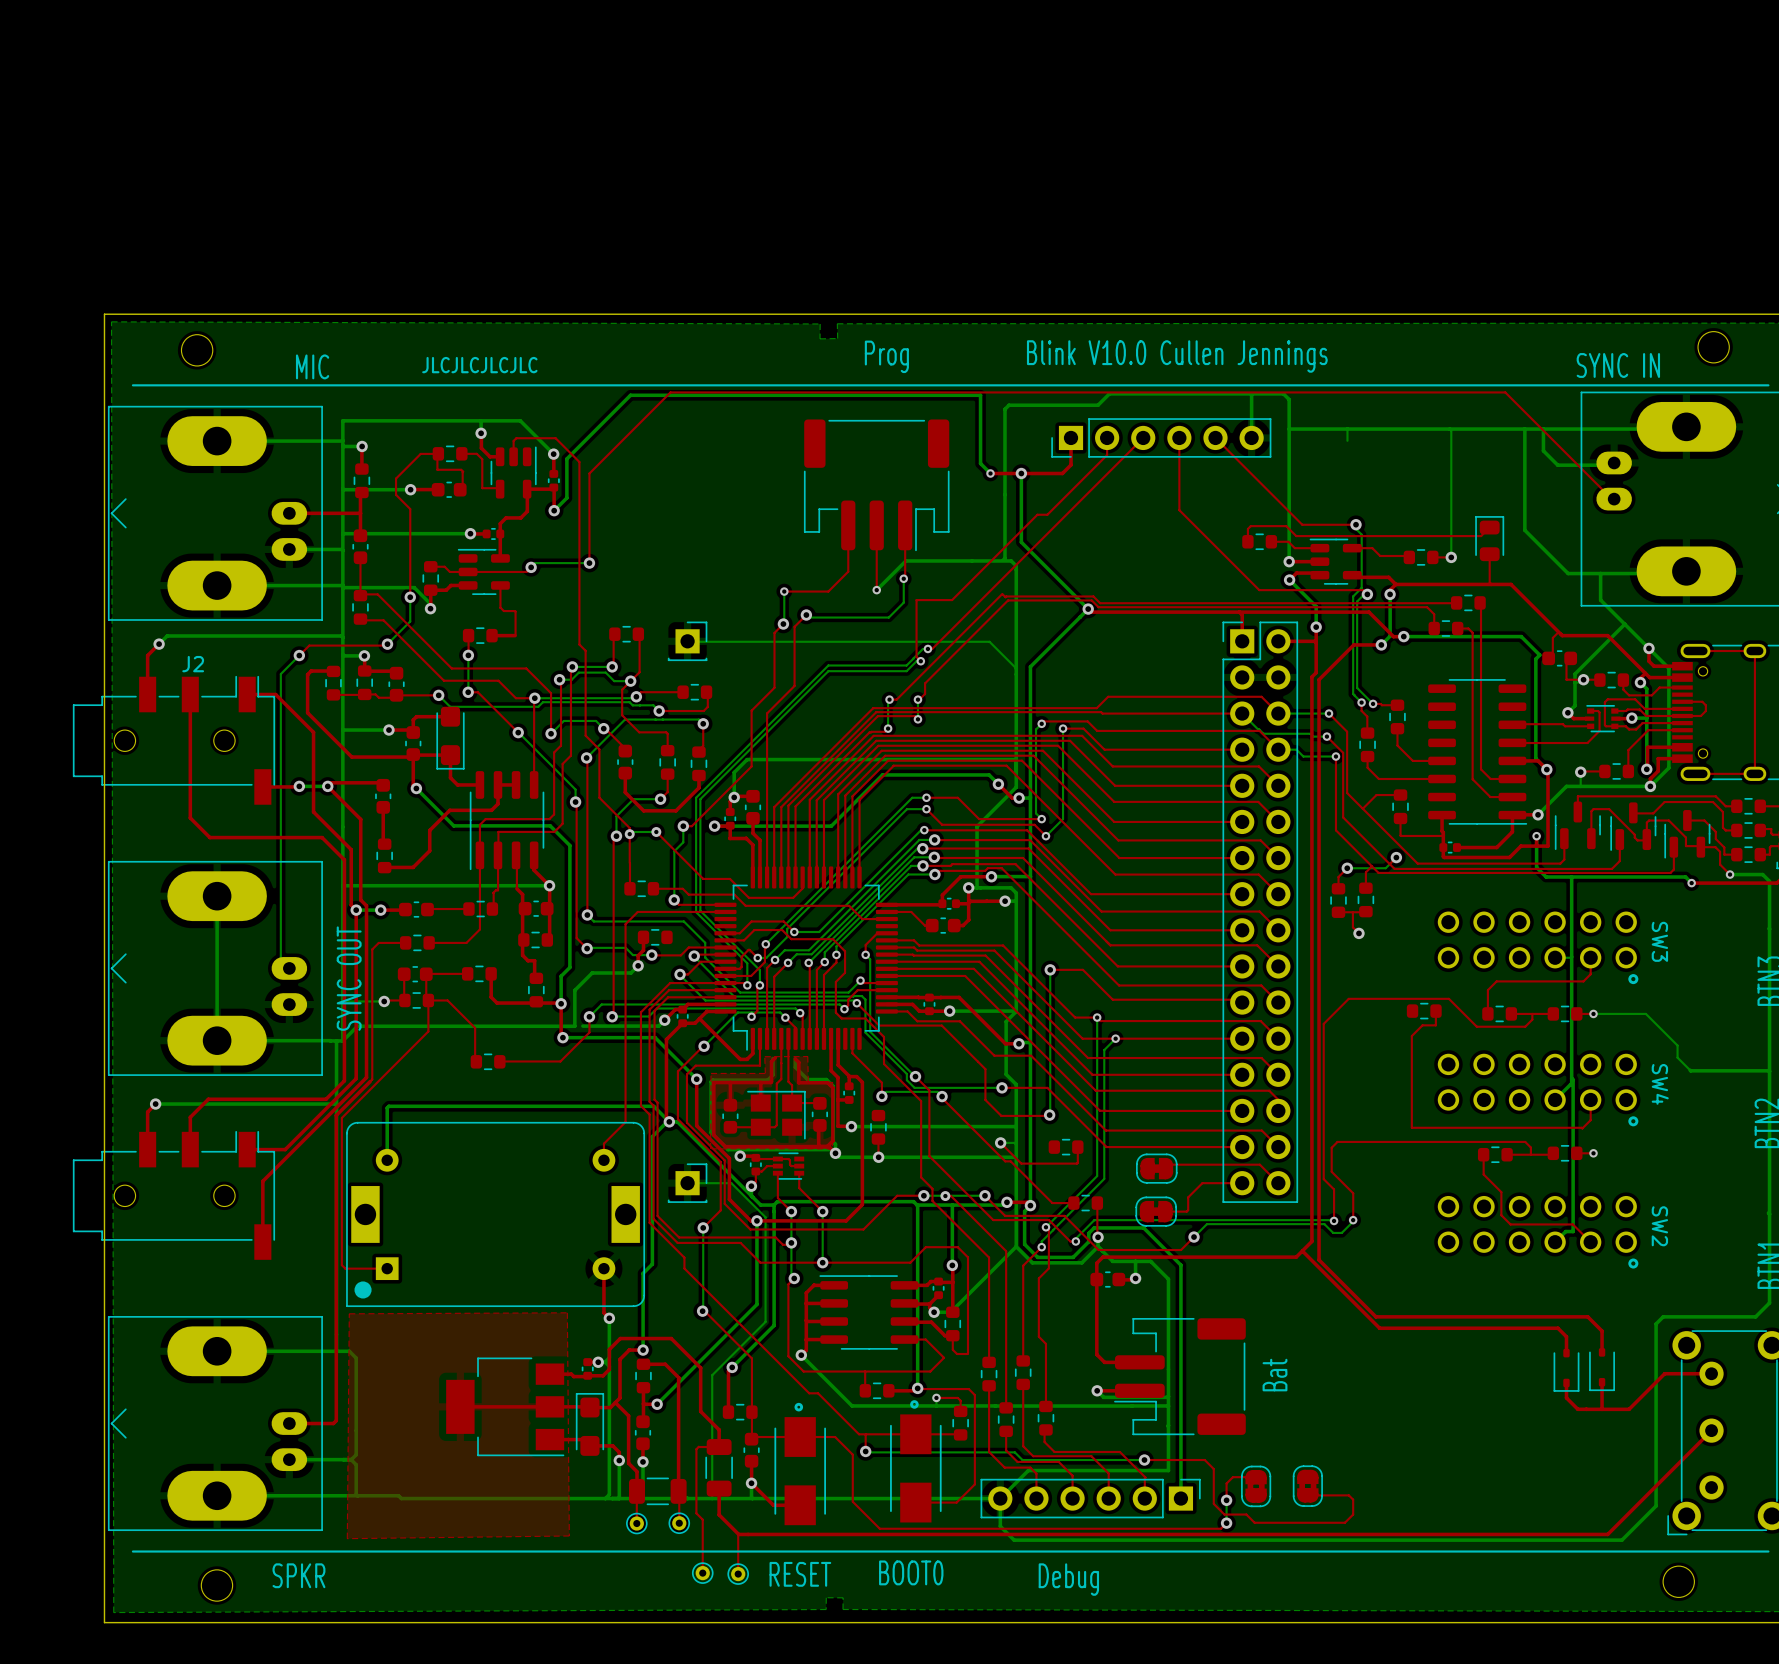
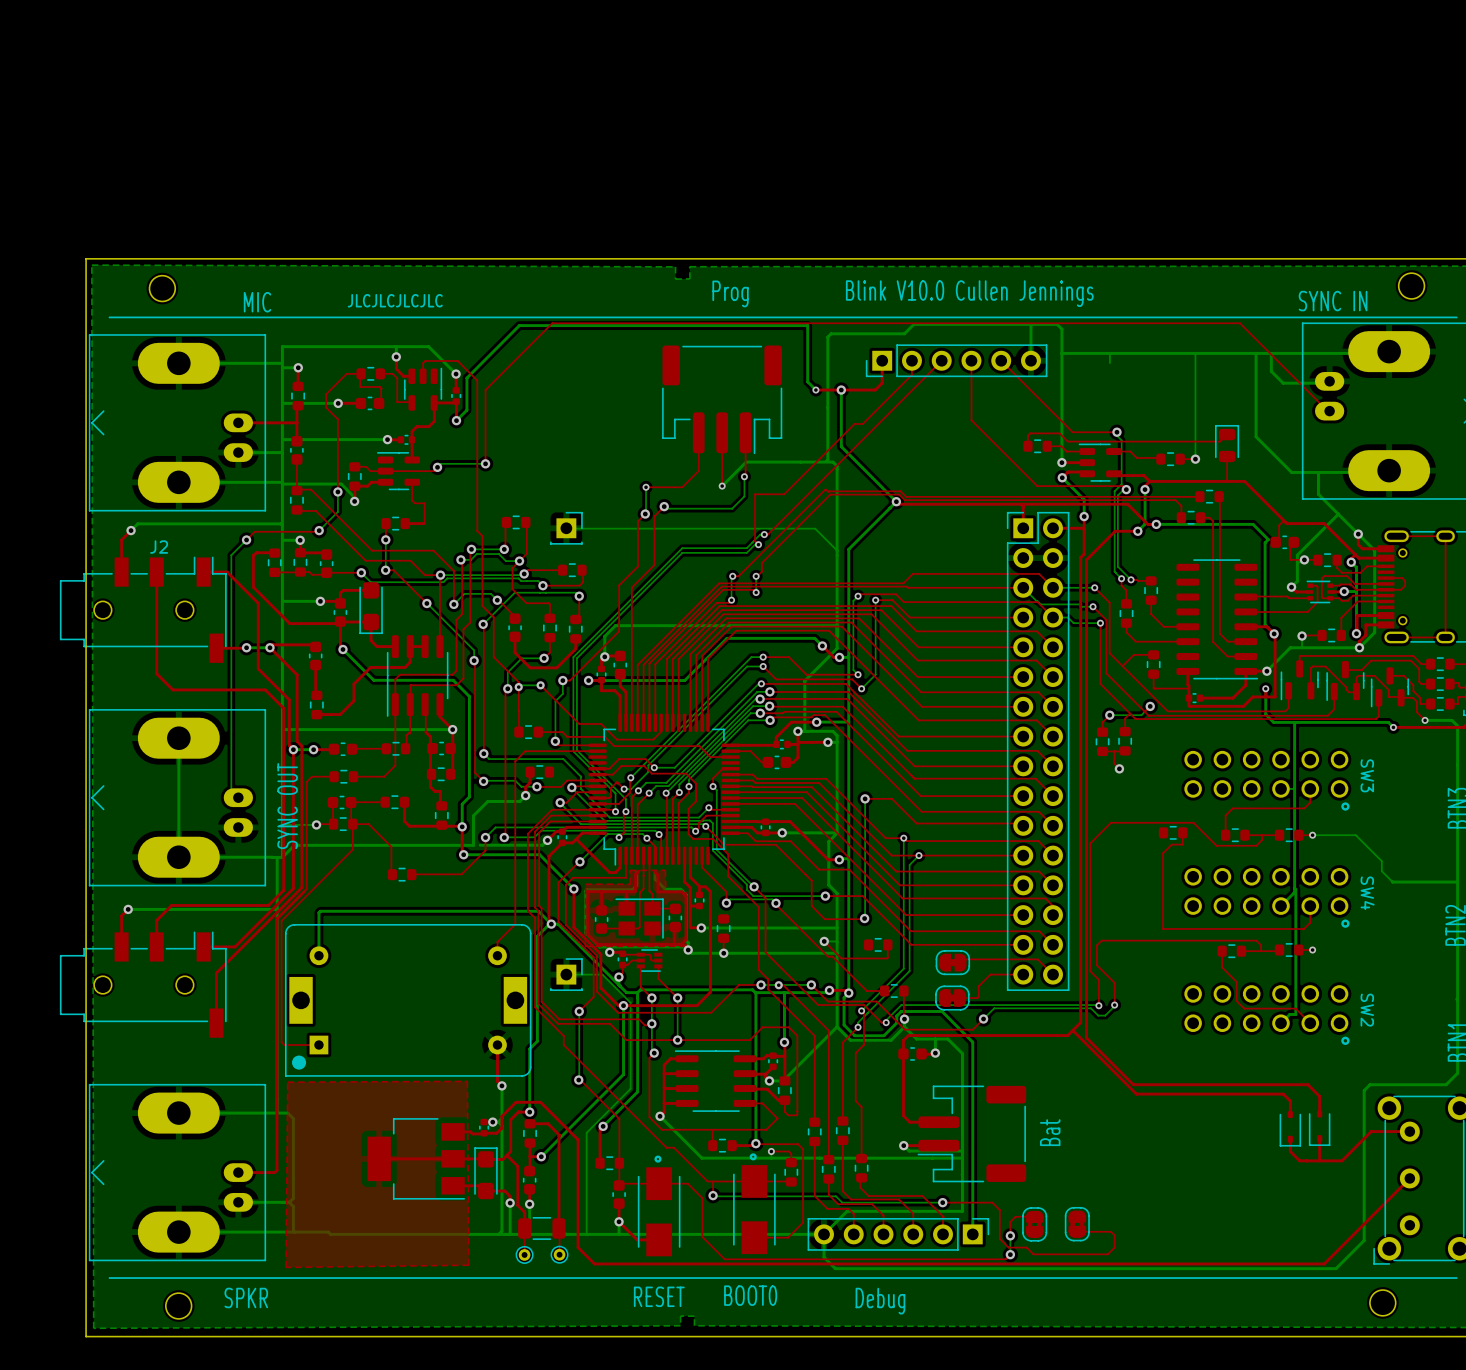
top track: (609, 1355) (609, 1349) (620, 1338) (671, 1338) (700, 1367) (700, 1411) (719, 1429) -> (501, 1116) (516, 1102) (540, 1102) (578, 1139) (578, 1247) (594, 1263) (608, 1263)
top track: (719, 1430) (719, 1447) (698, 1446) (696, 1449) (696, 1513) (702, 1519) (702, 1573) -> none
part: (719, 1467) -> none
top track: (719, 1488) (719, 1514) (738, 1534) (738, 1574) -> none
part: (702, 1573) -> none
part: (738, 1574) -> none

